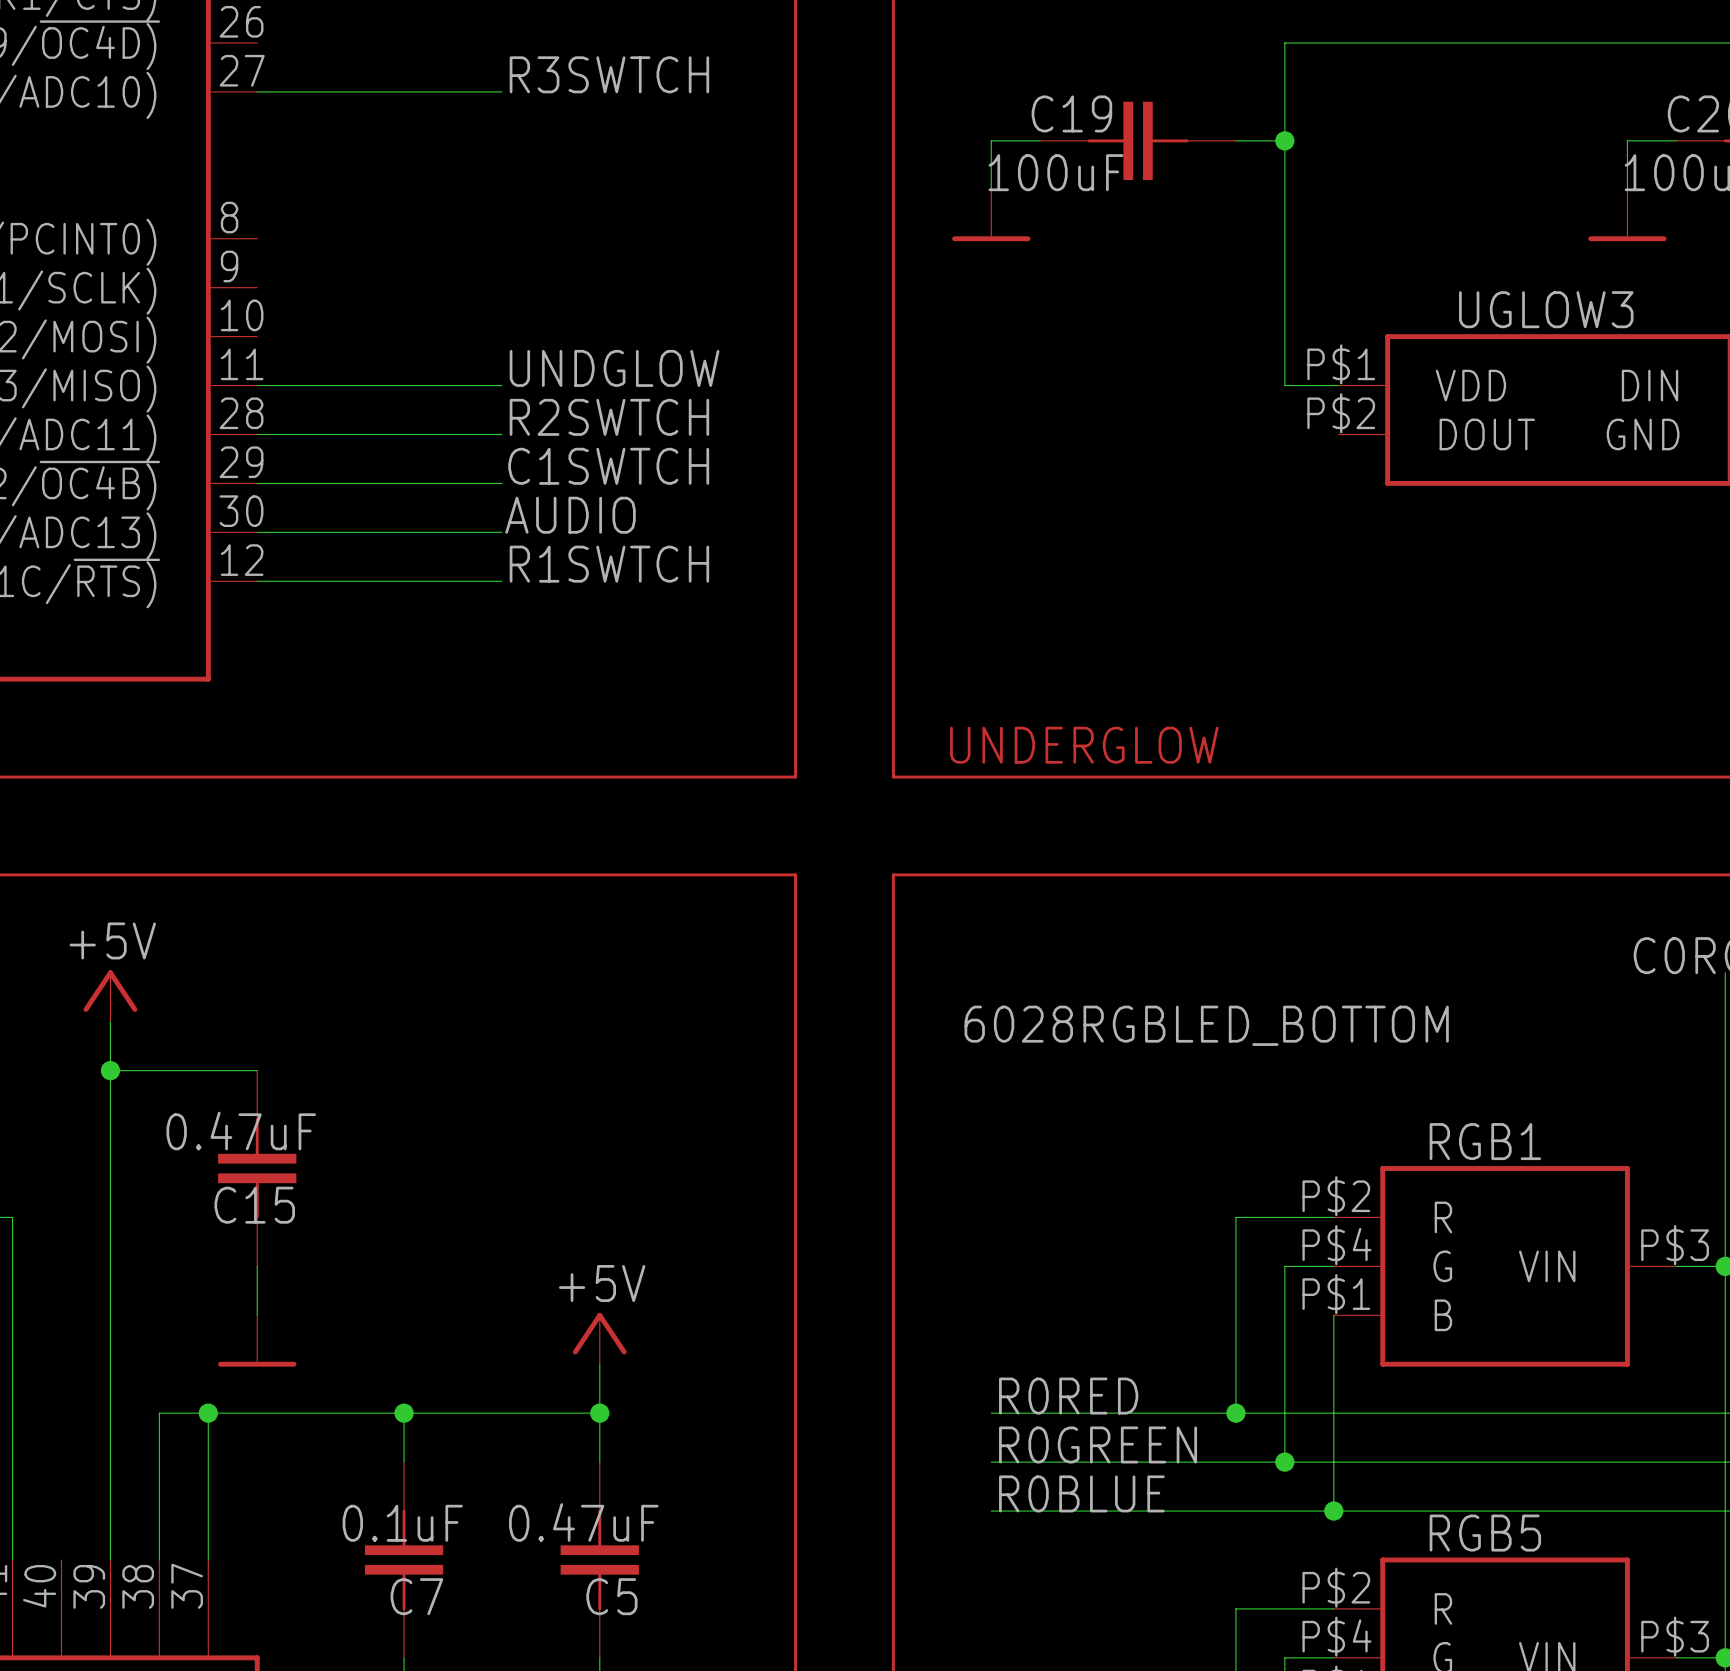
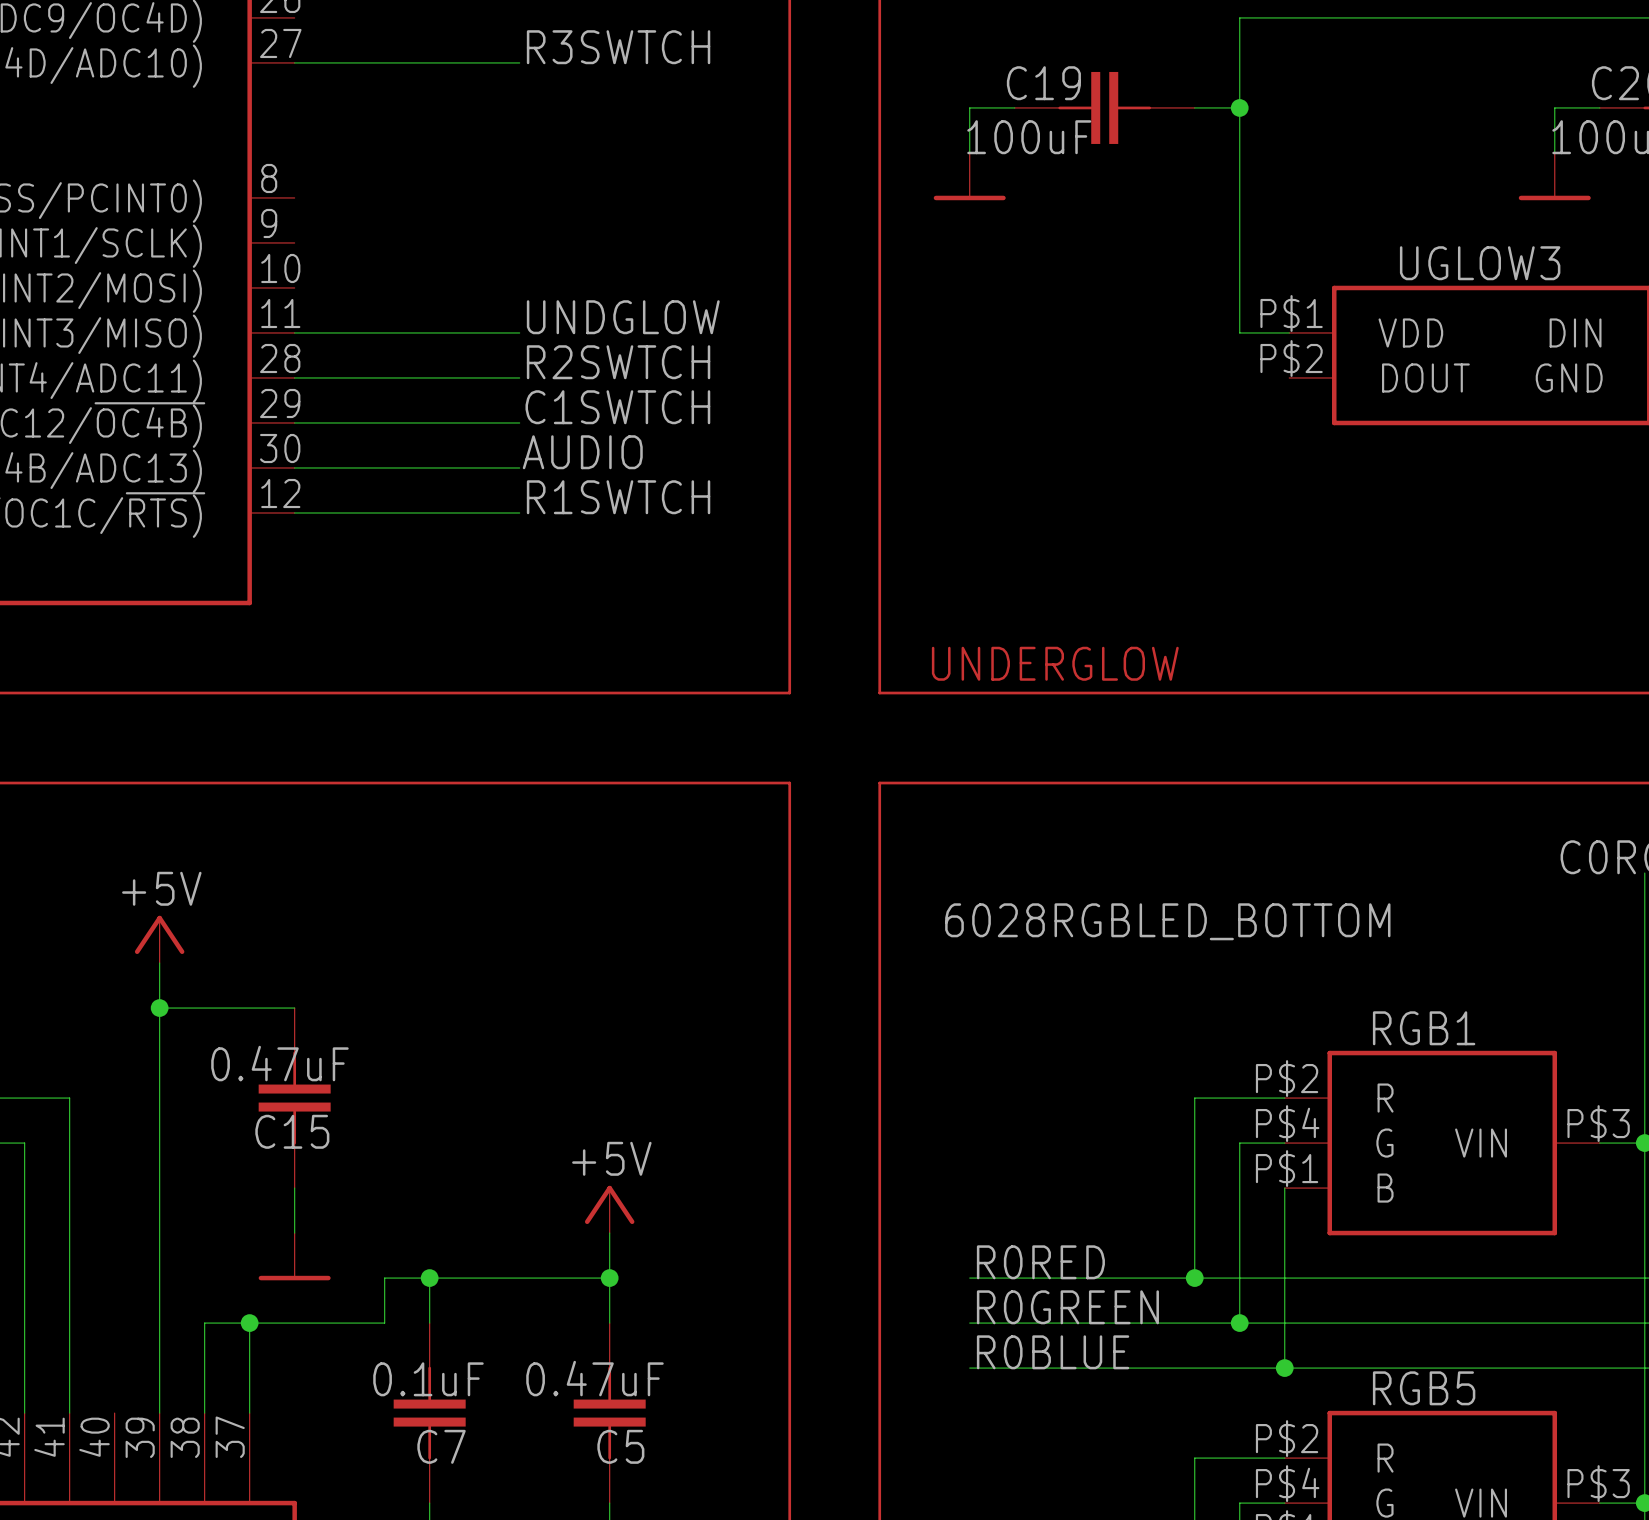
power symbol position: +5V (110, 996) -> +5V (159, 939)
wire: (110, 1021) (110, 1070) (257, 1070) -> none
junction position: (110, 1070) -> (159, 1008)
wire: none -> (159, 1008) (294, 1008)
C15 position: (257, 1168) -> (294, 1098)
power symbol position: (257, 1340) -> (294, 1256)
wire: (208, 1413) (208, 1462) -> none
junction position: (208, 1413) -> (249, 1323)
wire: (355, 1413) (159, 1413) (159, 1462) -> (384, 1278) (384, 1323) (204, 1323)

